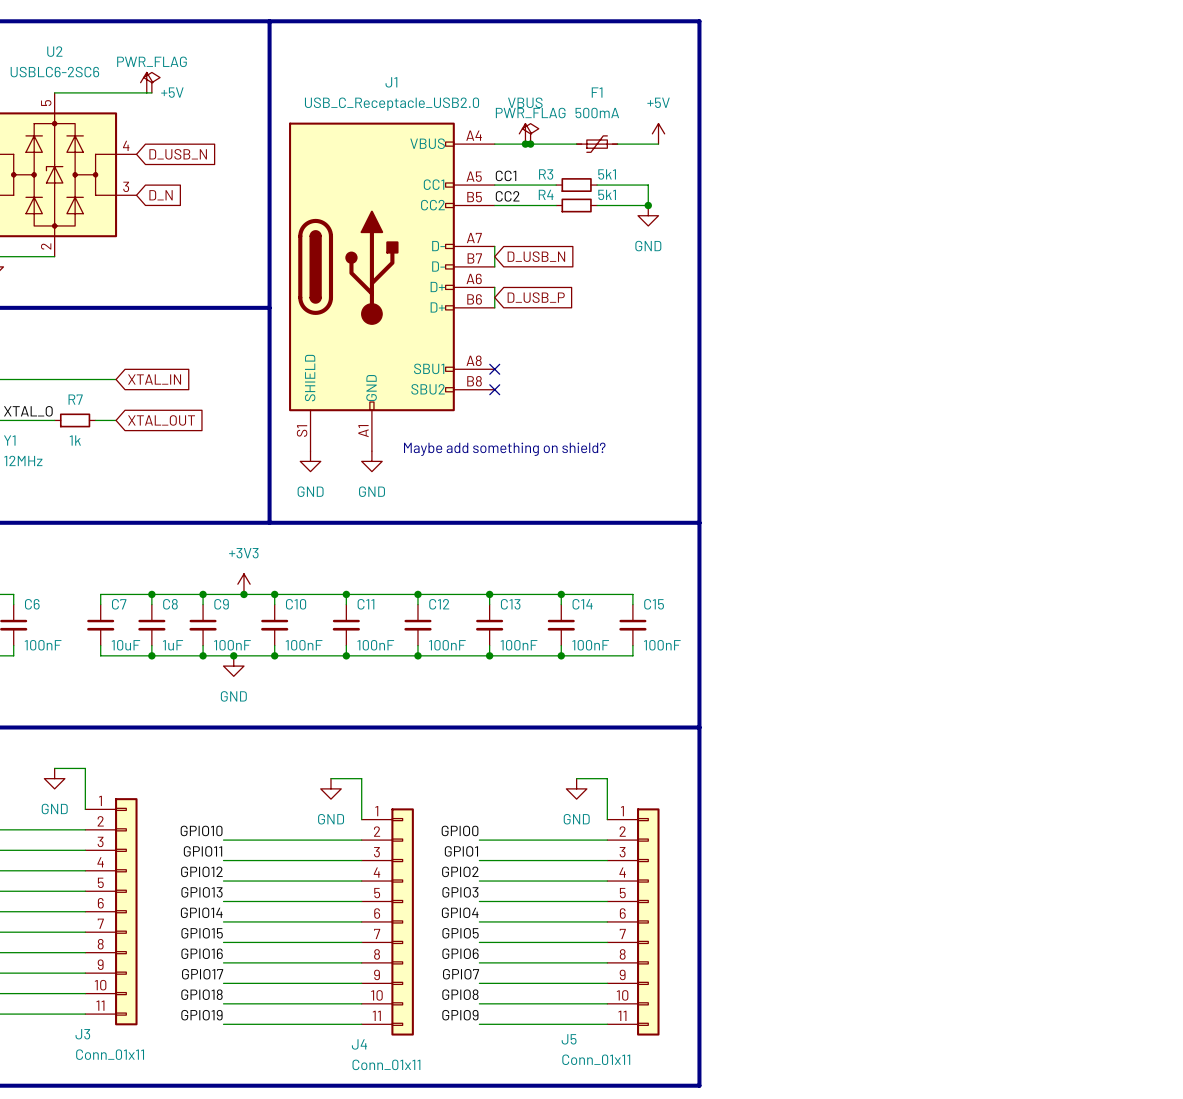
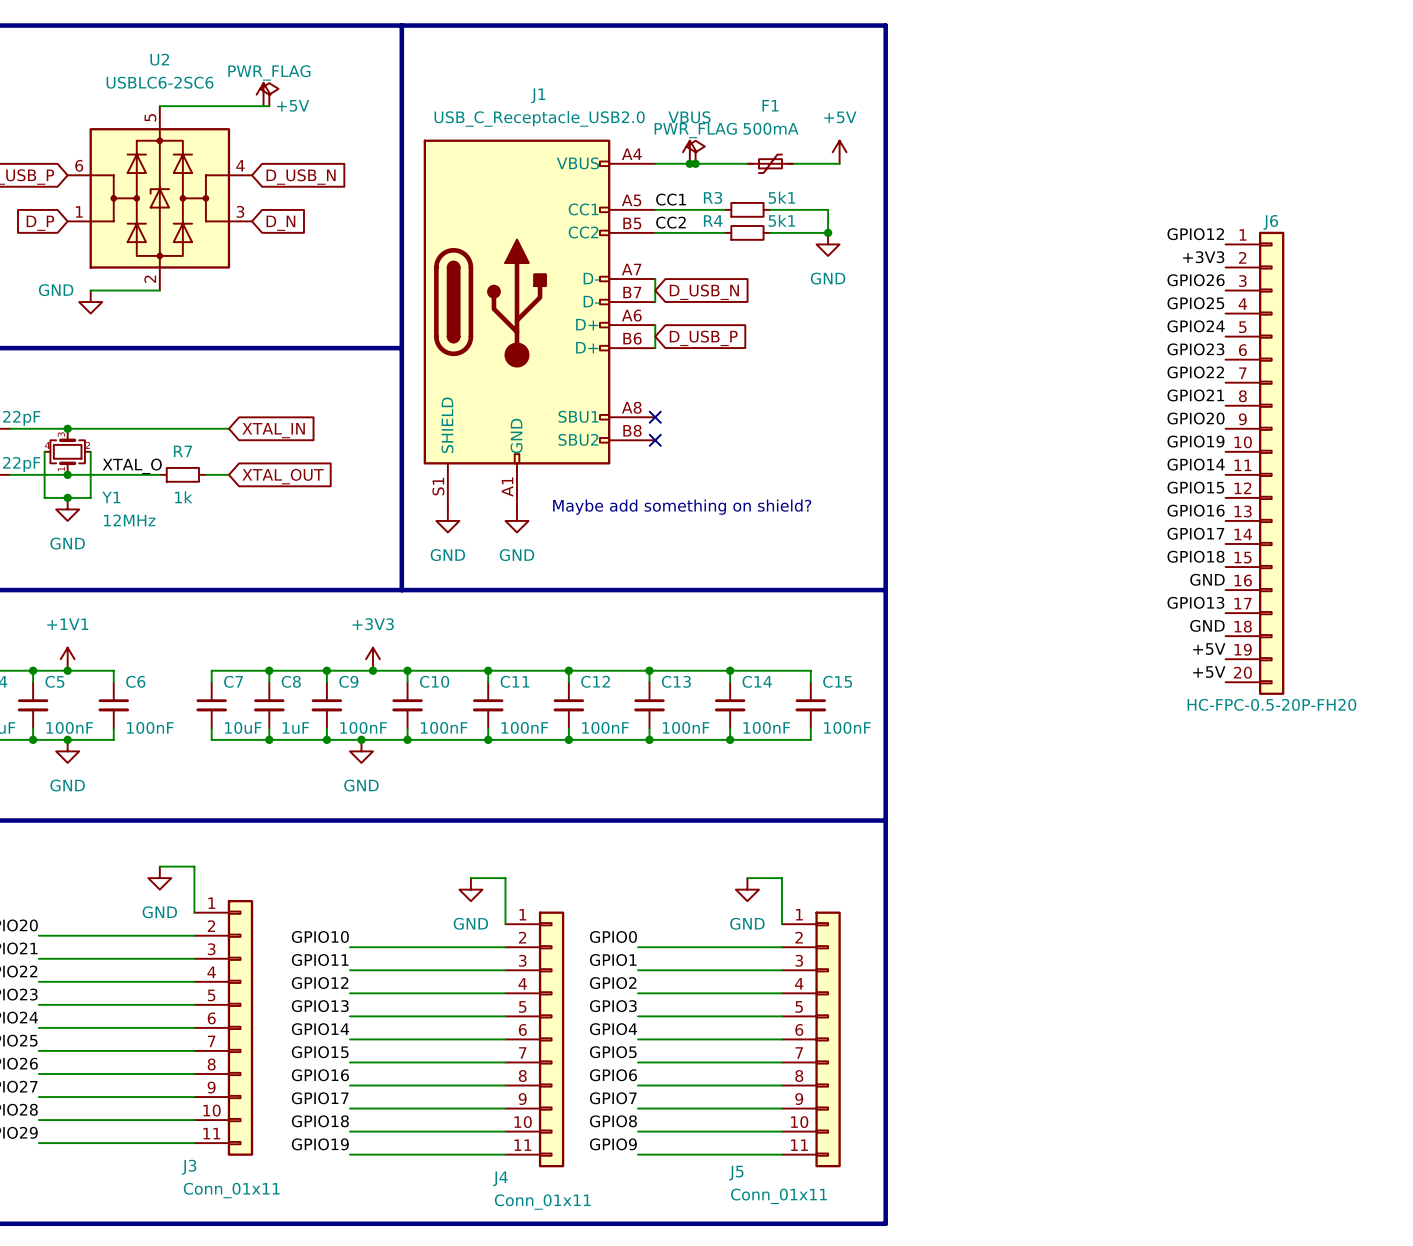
label: none -> GPIO12 (1195, 234)
label: none -> +3V3 (1203, 257)
label: none -> GPIO26 (1196, 280)
label: none -> GPIO25 (1195, 303)
label: none -> GPIO24 (1196, 326)
label: none -> GPIO23 (1195, 349)
label: none -> GPIO22 (1195, 372)
label: none -> GPIO21 (1195, 395)
label: none -> GPIO20 (1196, 418)
label: none -> GPIO19 (1195, 441)
J6: none -> HC-FPC-0.5-20P-FH20 (1254, 463)
label: none -> GPIO14 (1196, 464)
label: none -> GPIO15 (1195, 487)
label: none -> GPIO16 (1196, 510)
label: none -> GPIO17 (1195, 533)
label: none -> GPIO18 (1195, 556)
label: none -> GND (1207, 579)
label: none -> GPIO13 (1195, 602)
label: none -> GND (1207, 625)
label: none -> +5V (1209, 649)
label: none -> +5V (1209, 672)

